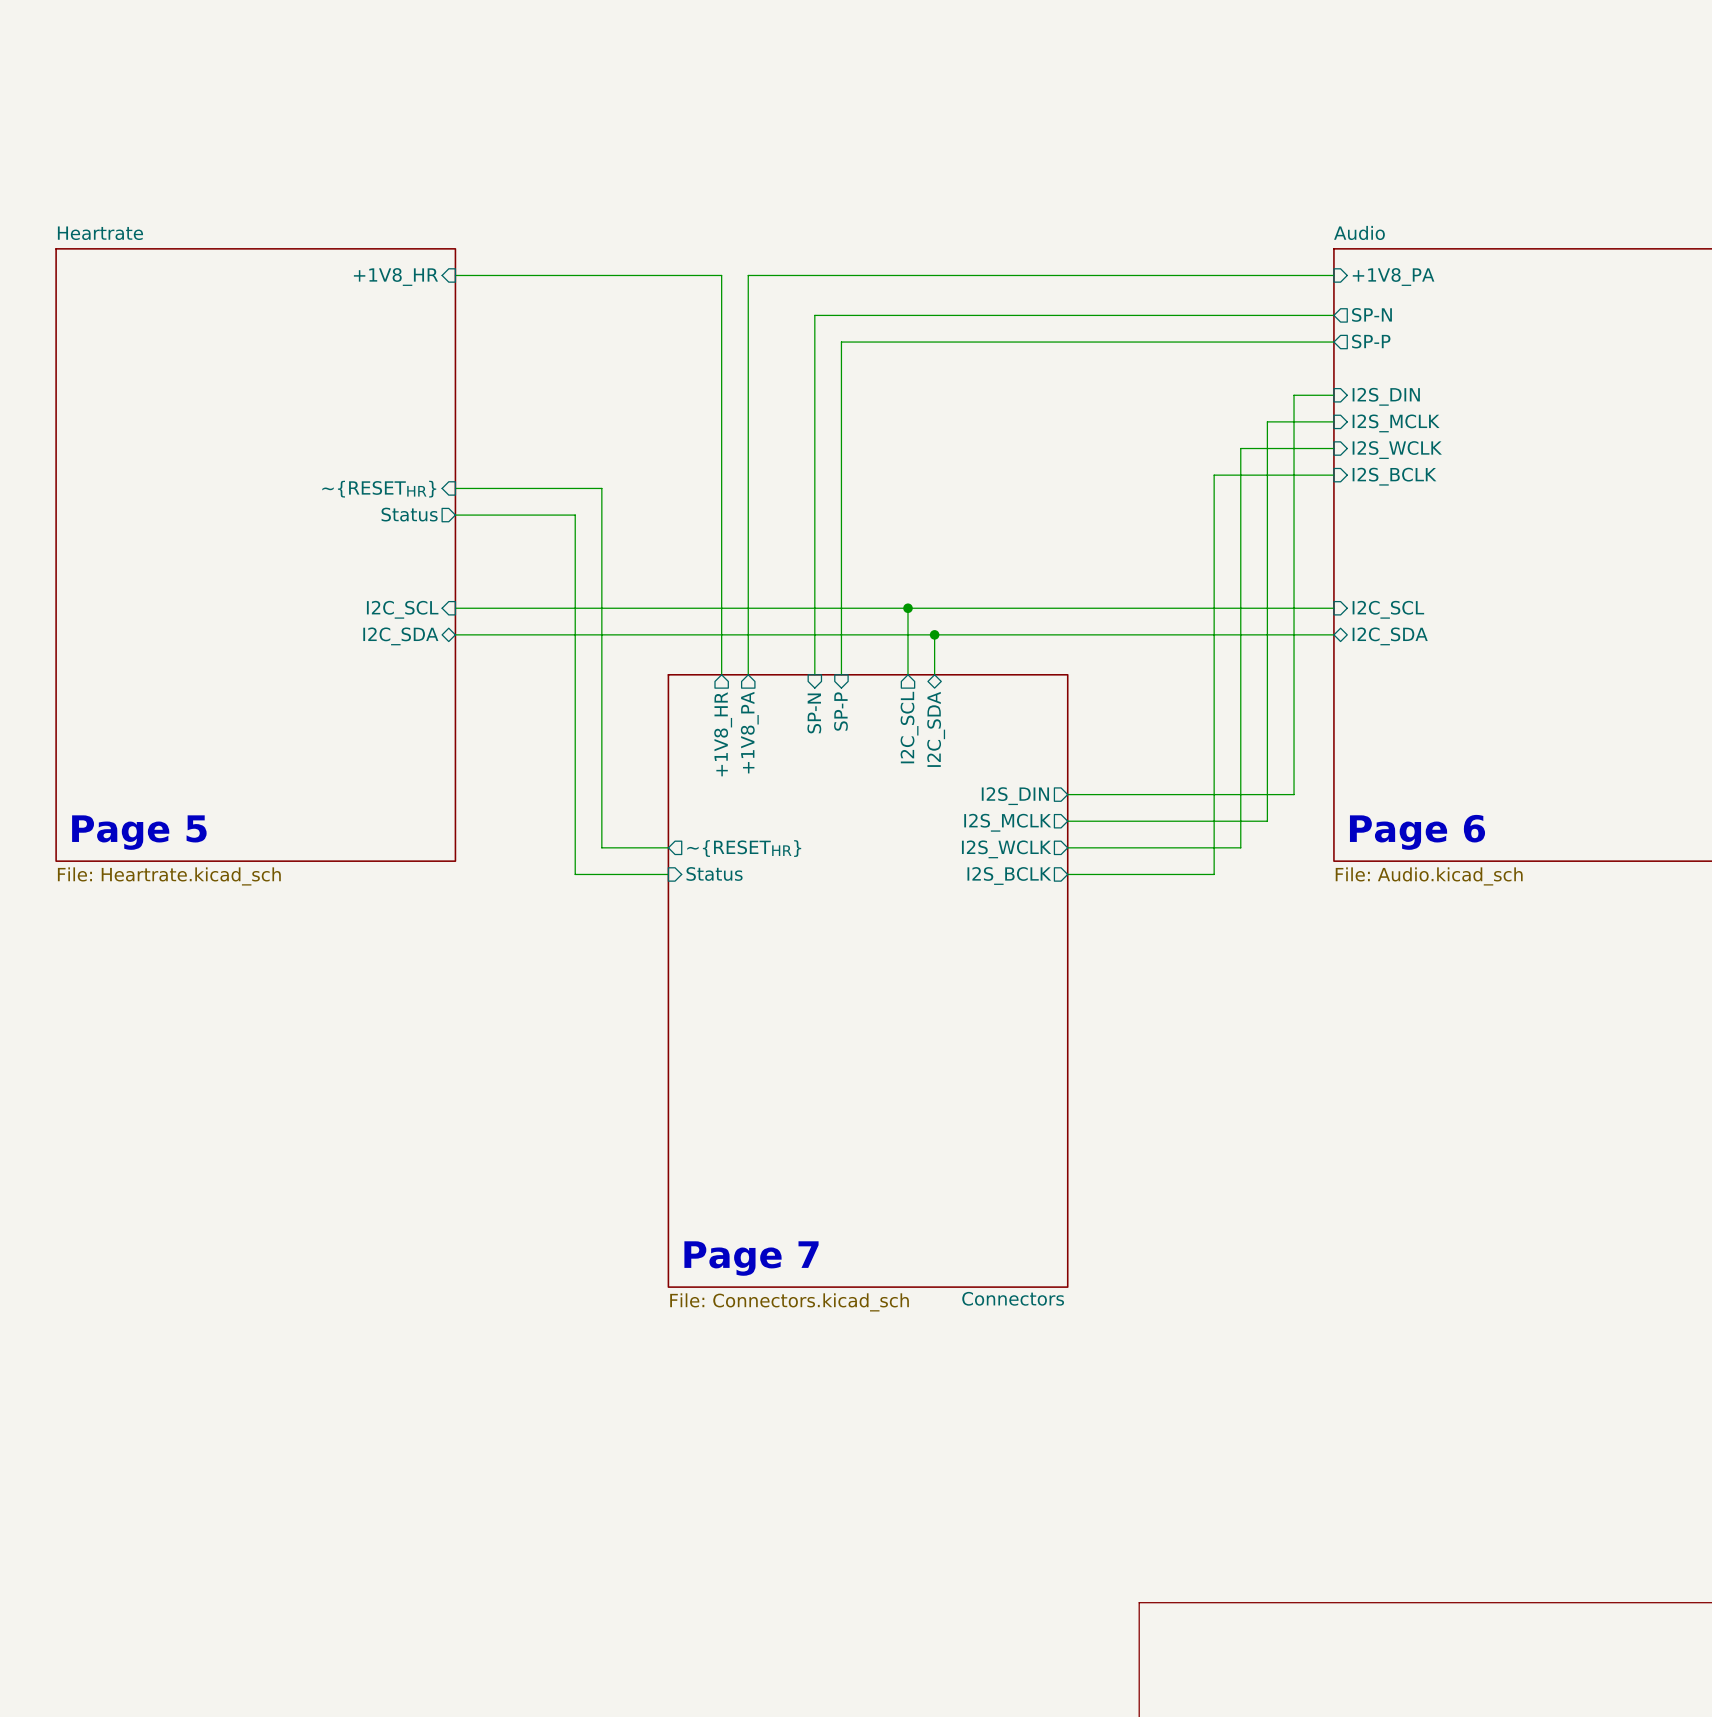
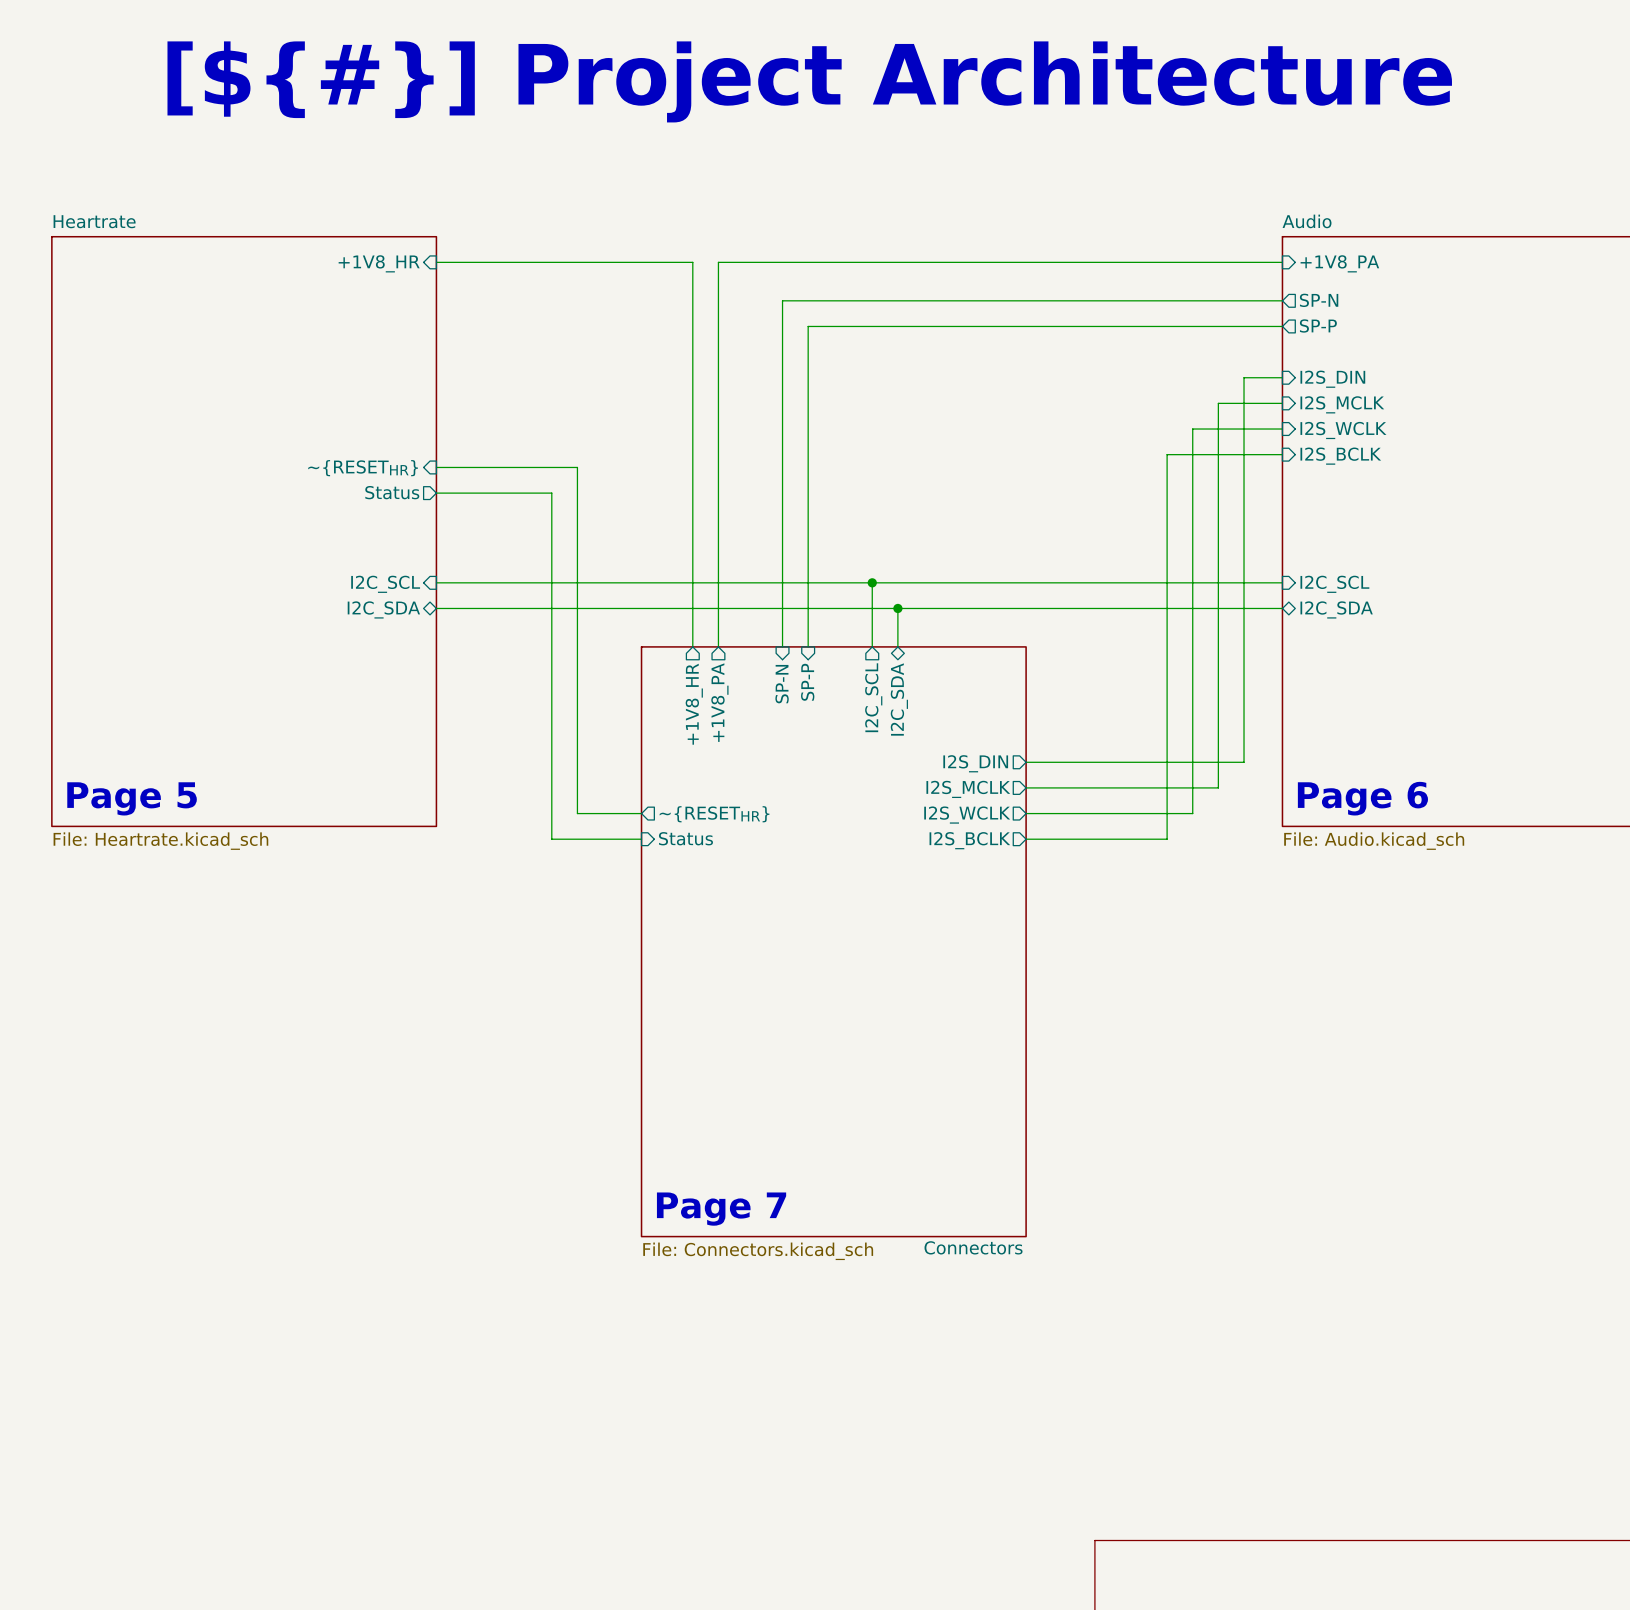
text: none -> [${#}] Project Architecture (809, 81)

